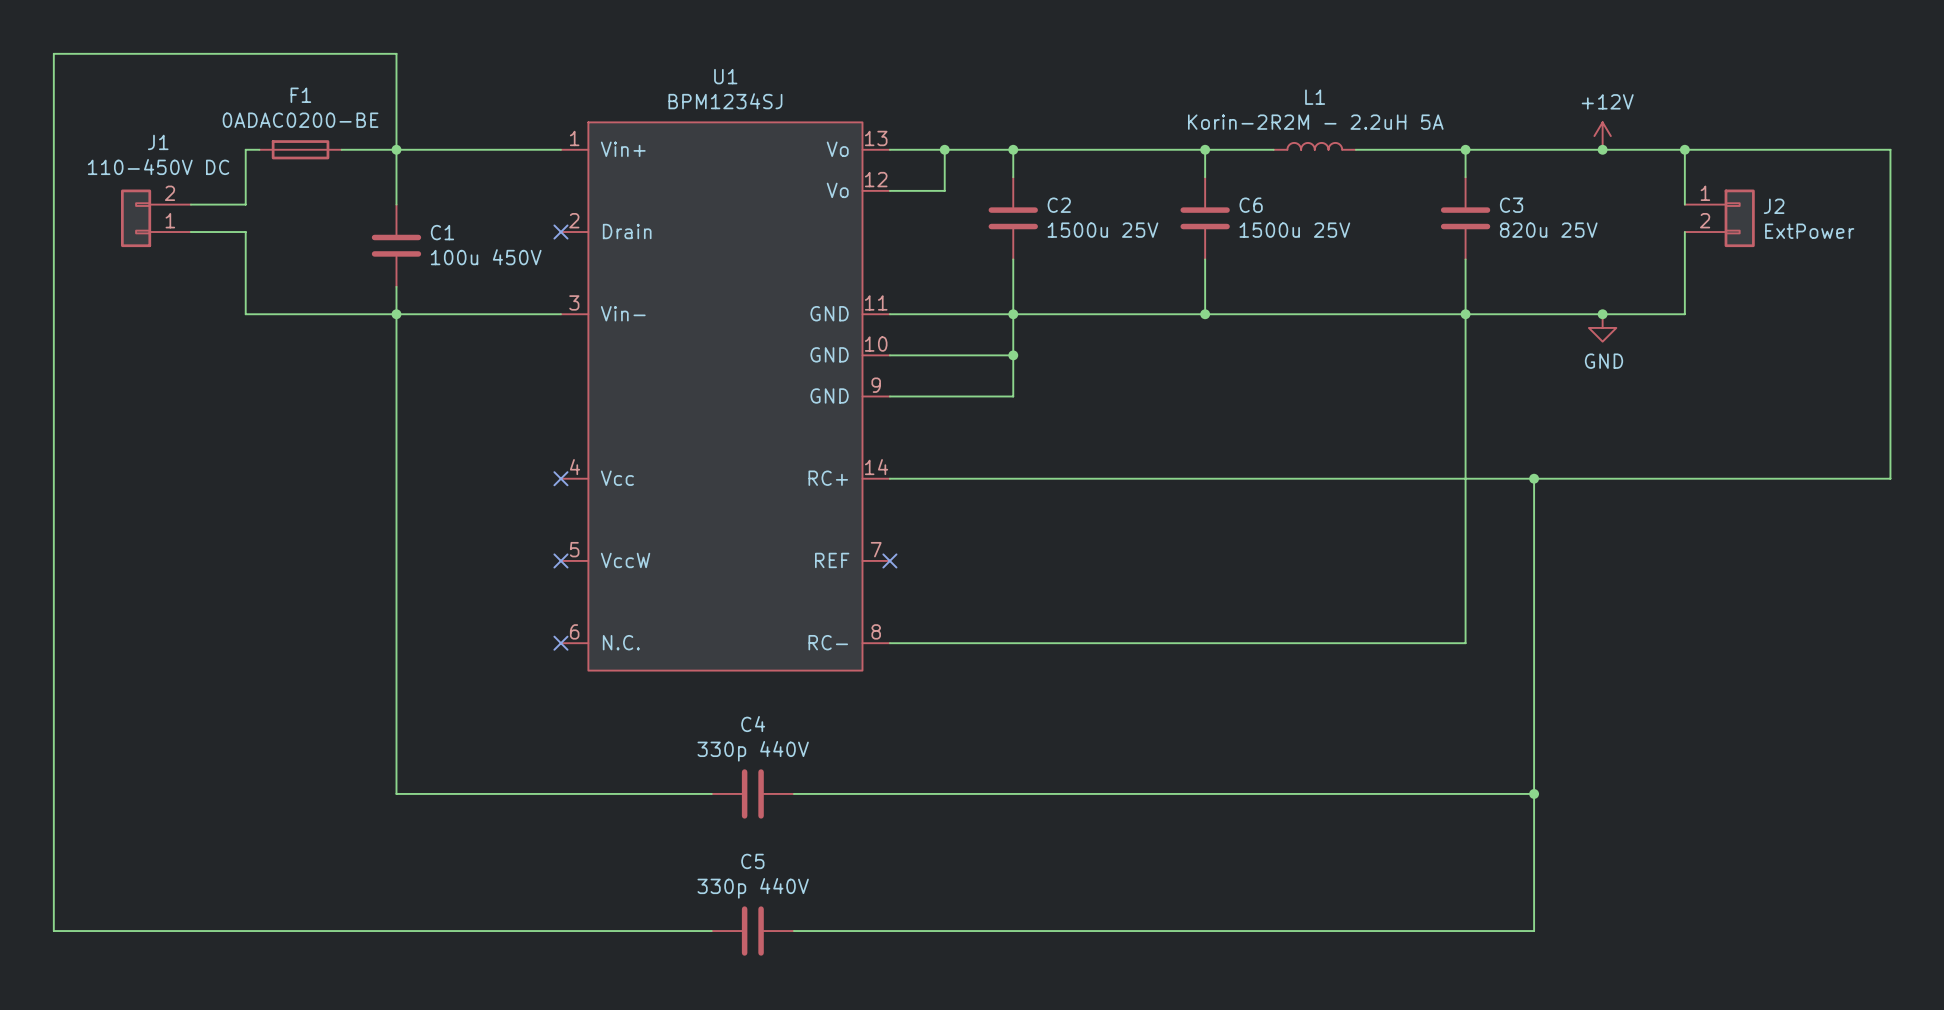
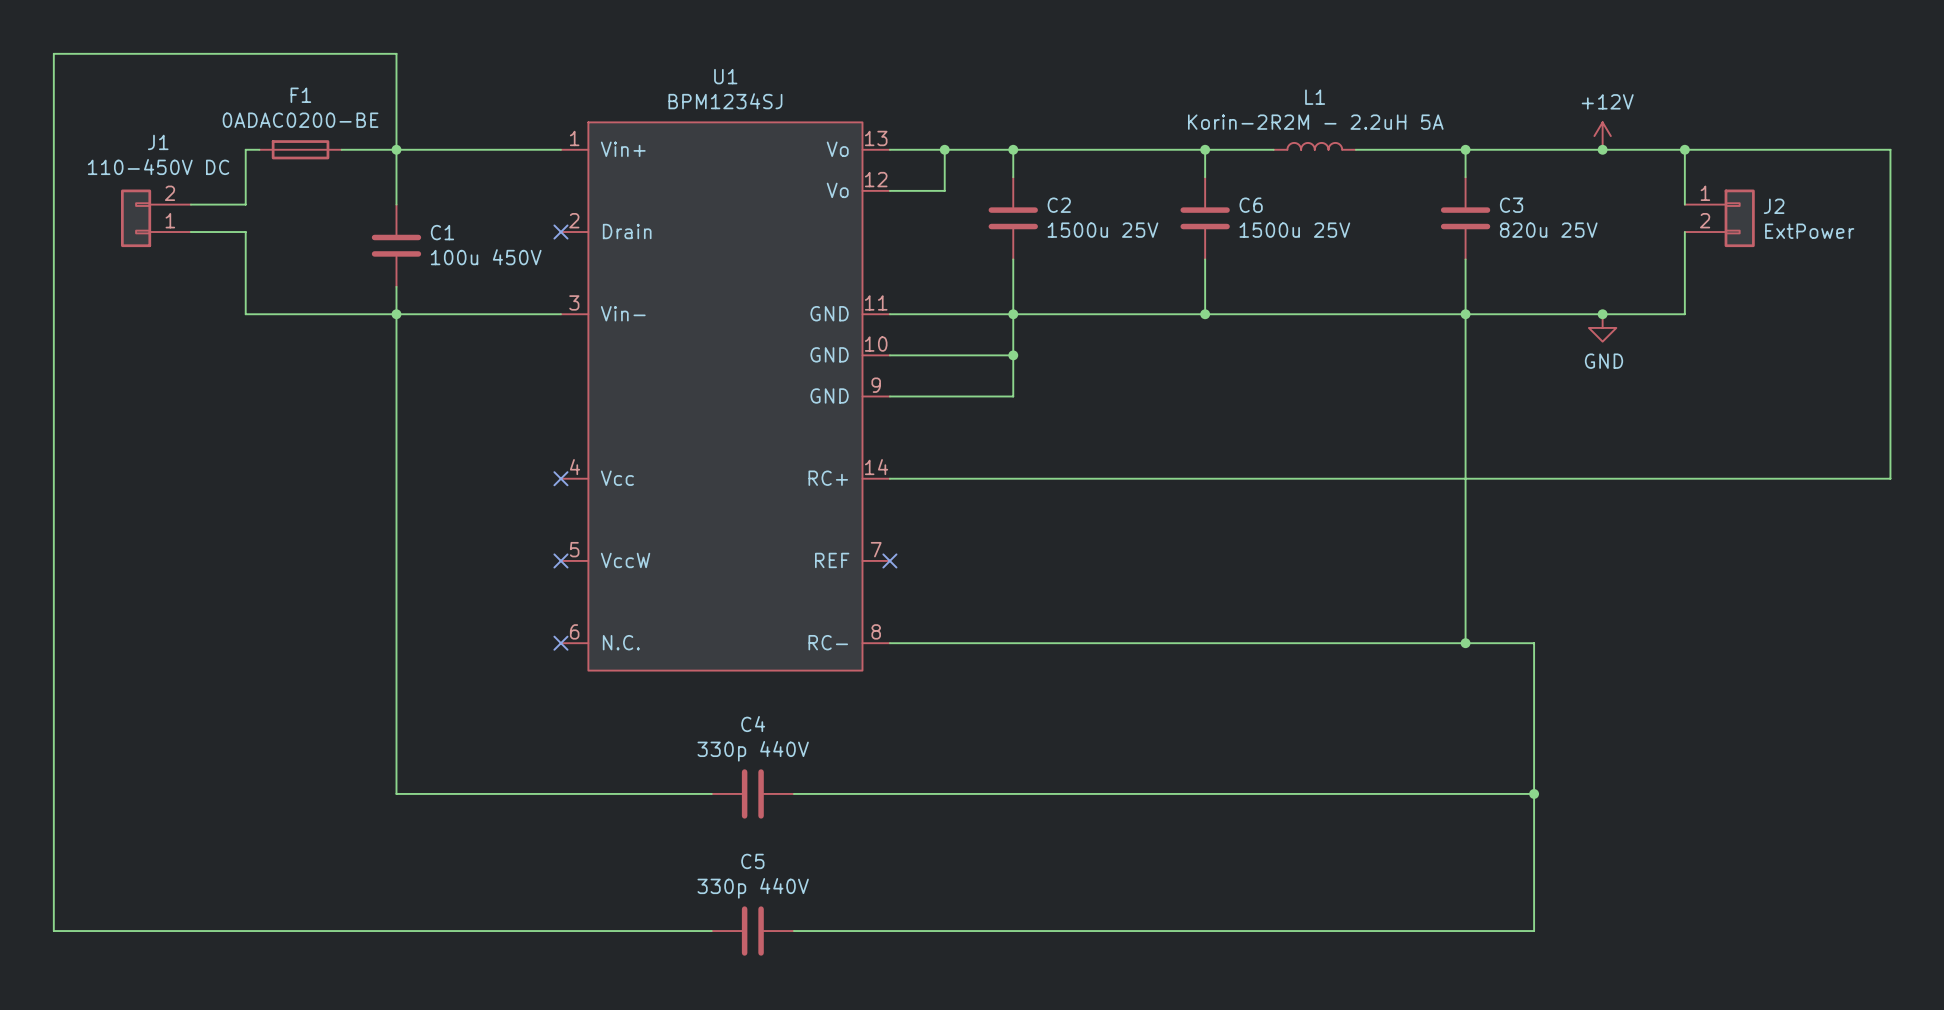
wire: (1534, 478) (1534, 643) -> (1465, 643) (1534, 643)
junction: (1534, 478) -> none
junction: none -> (1465, 643)

